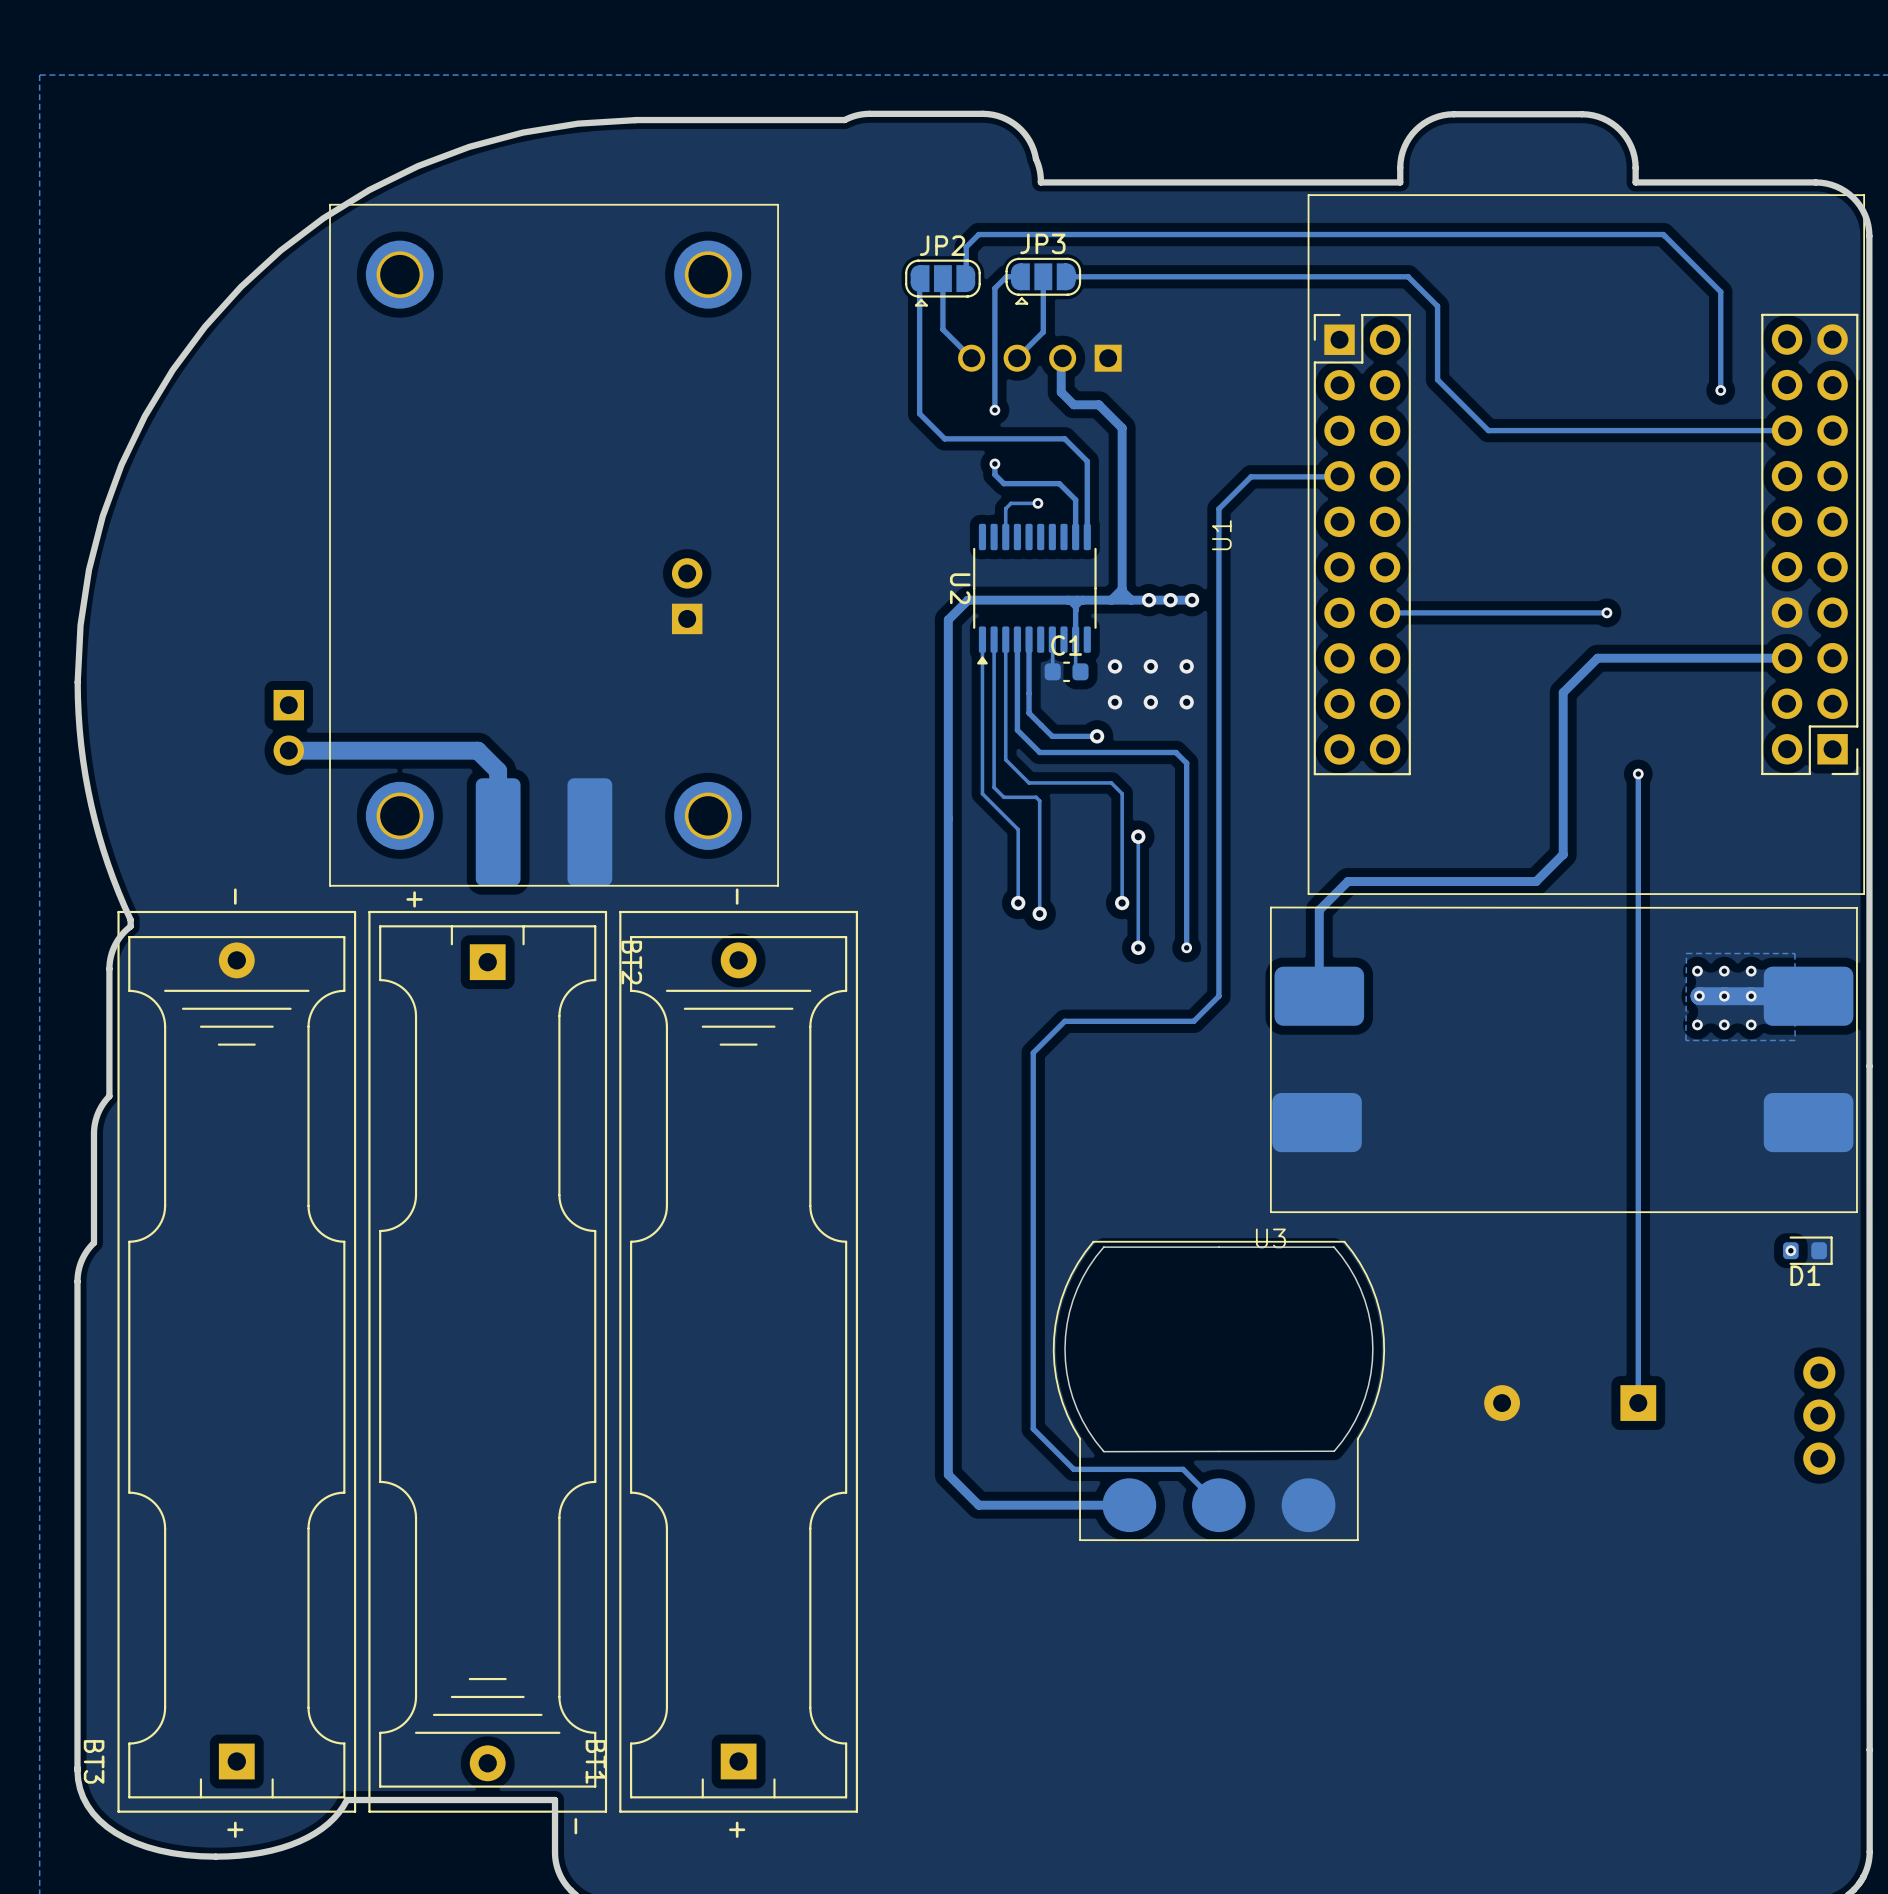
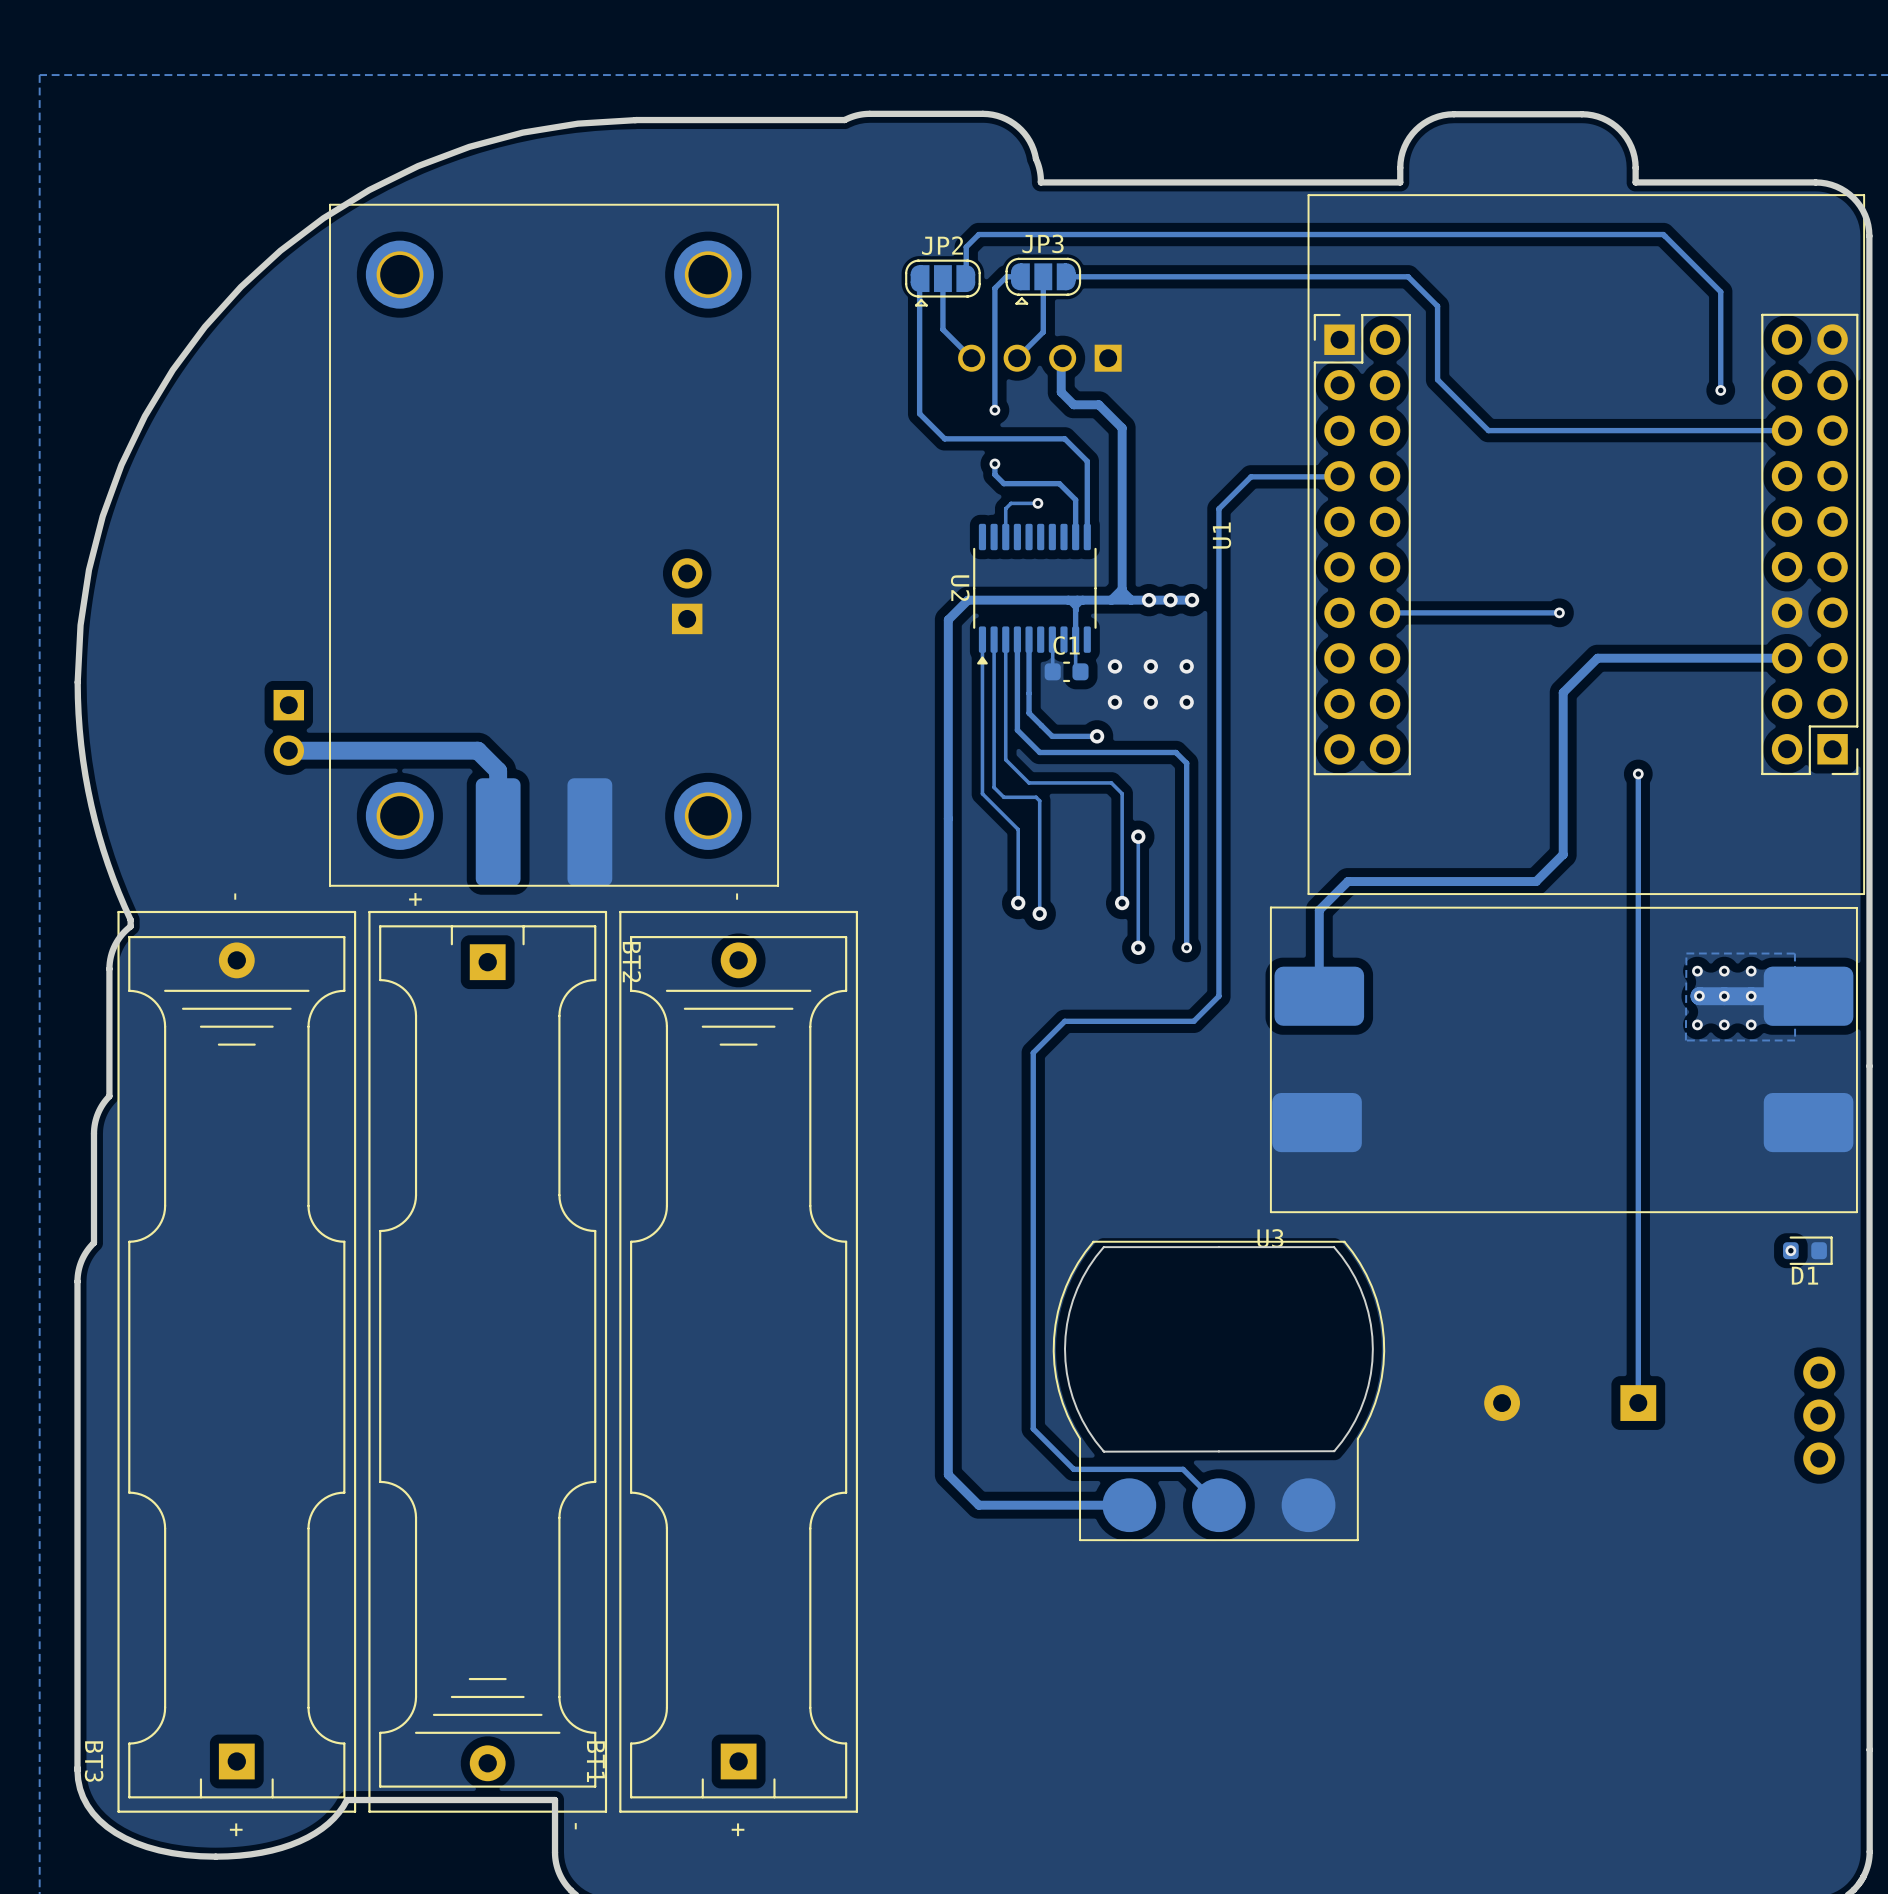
track: (1606, 612) (1559, 612) -> none
via position: (1606, 612) -> (1559, 612)

